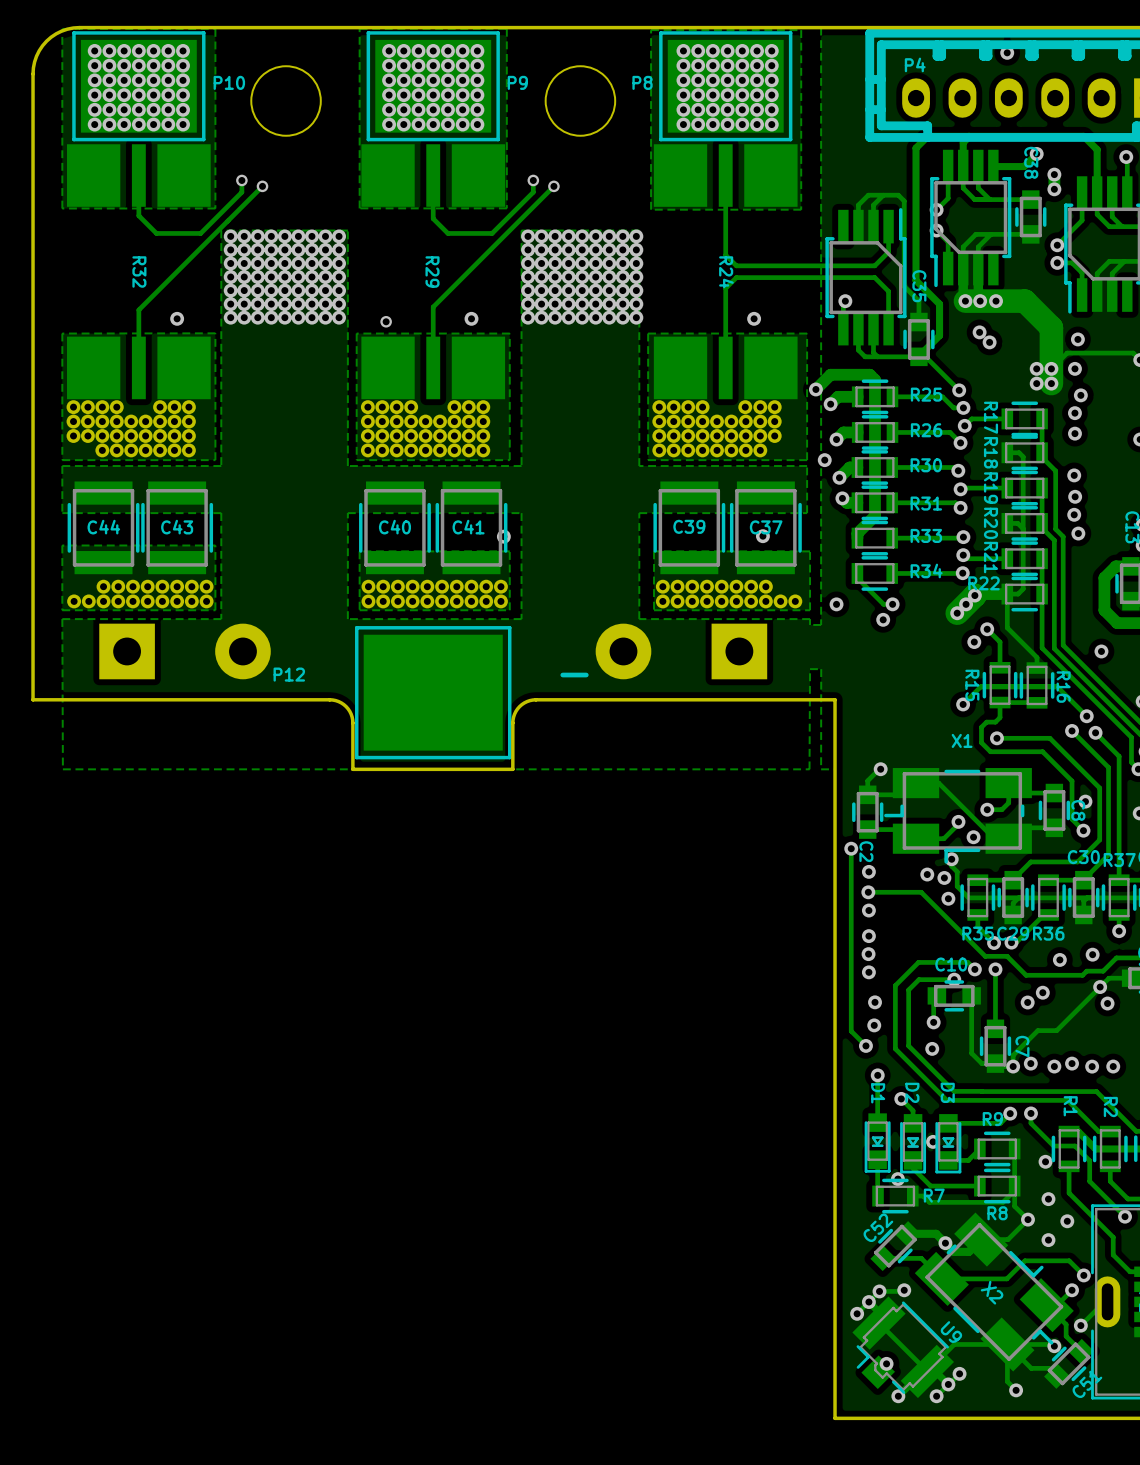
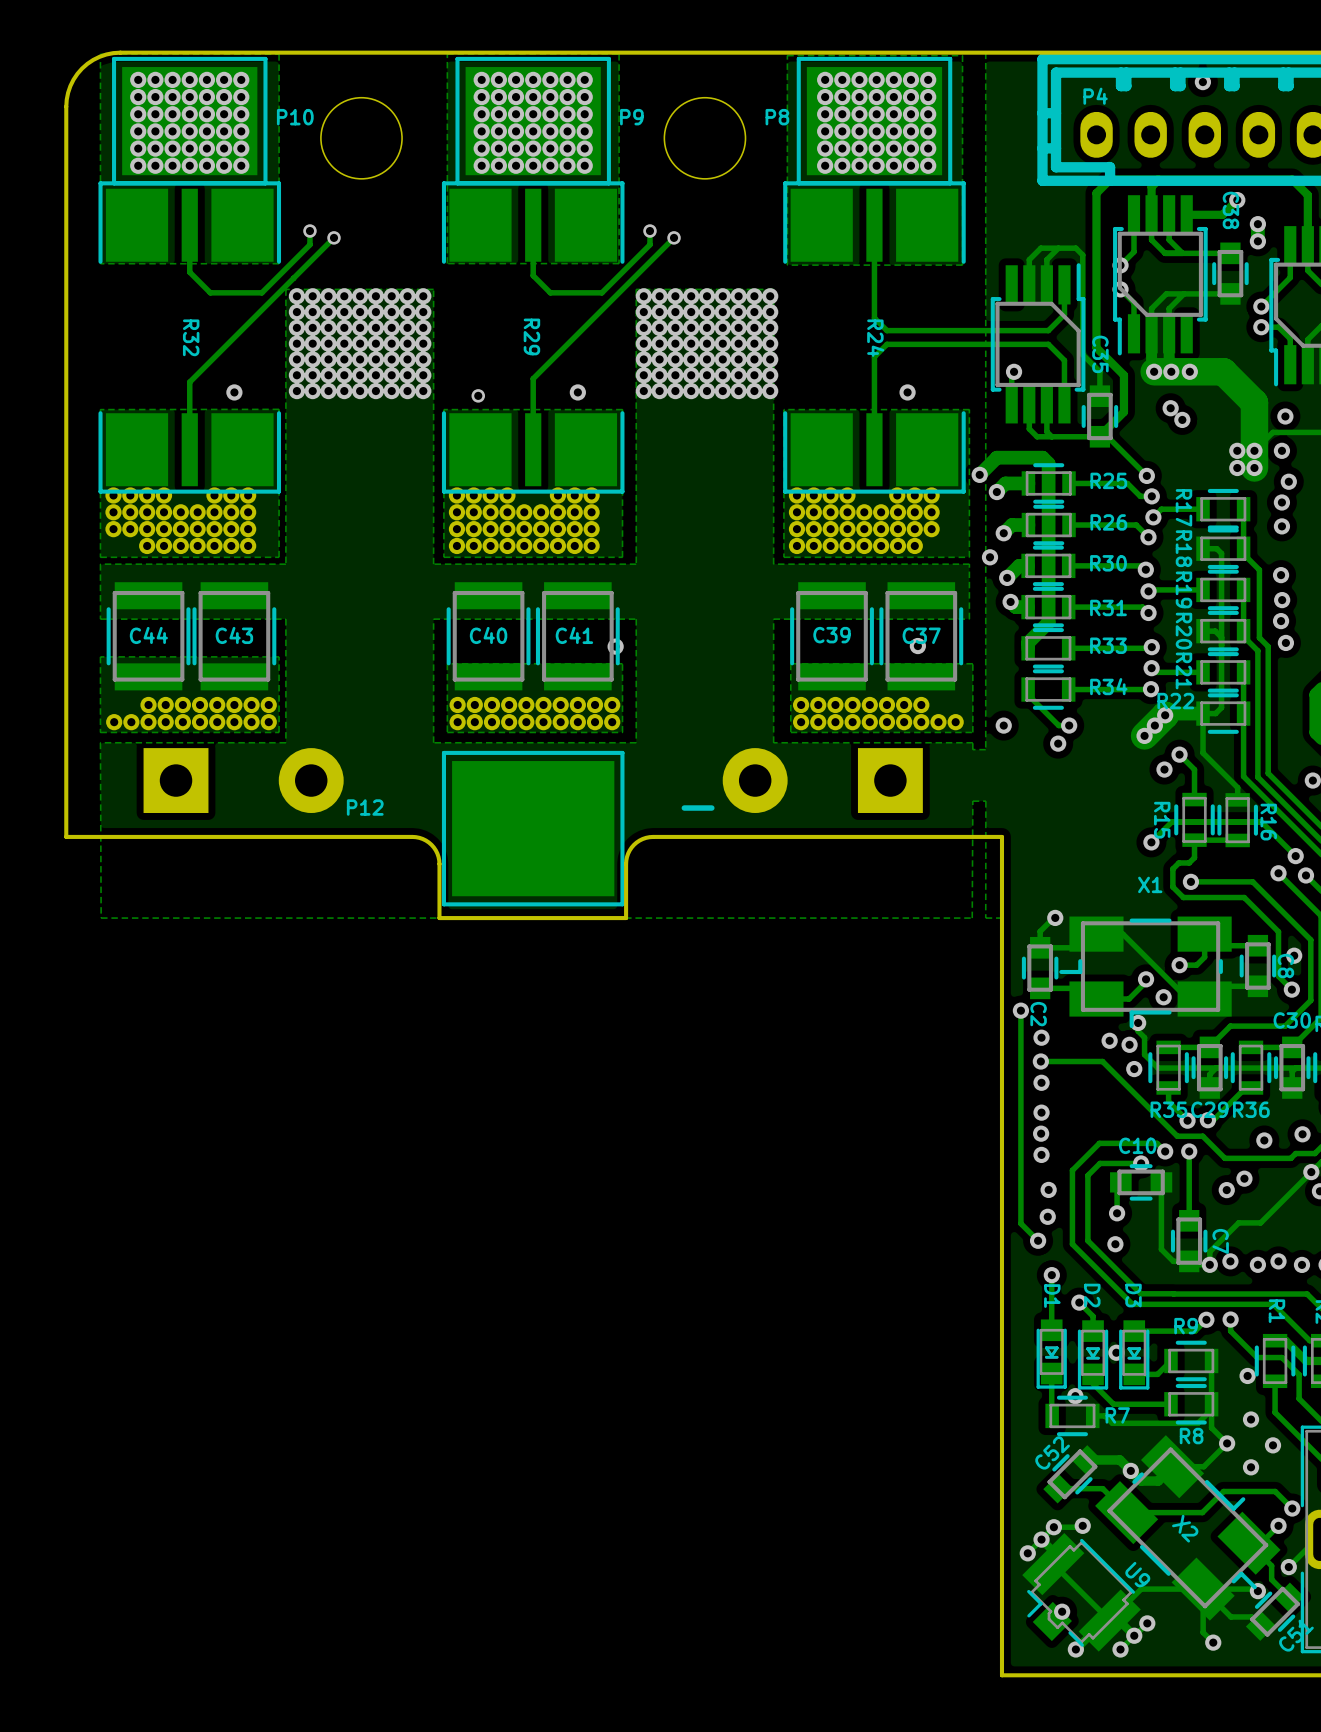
R32 footprint: [67, 144, 211, 400] -> [98, 181, 282, 494]
R29 footprint: [361, 144, 506, 400] -> [441, 181, 625, 494]
R24 footprint: [653, 144, 798, 400] -> [783, 181, 966, 494]

